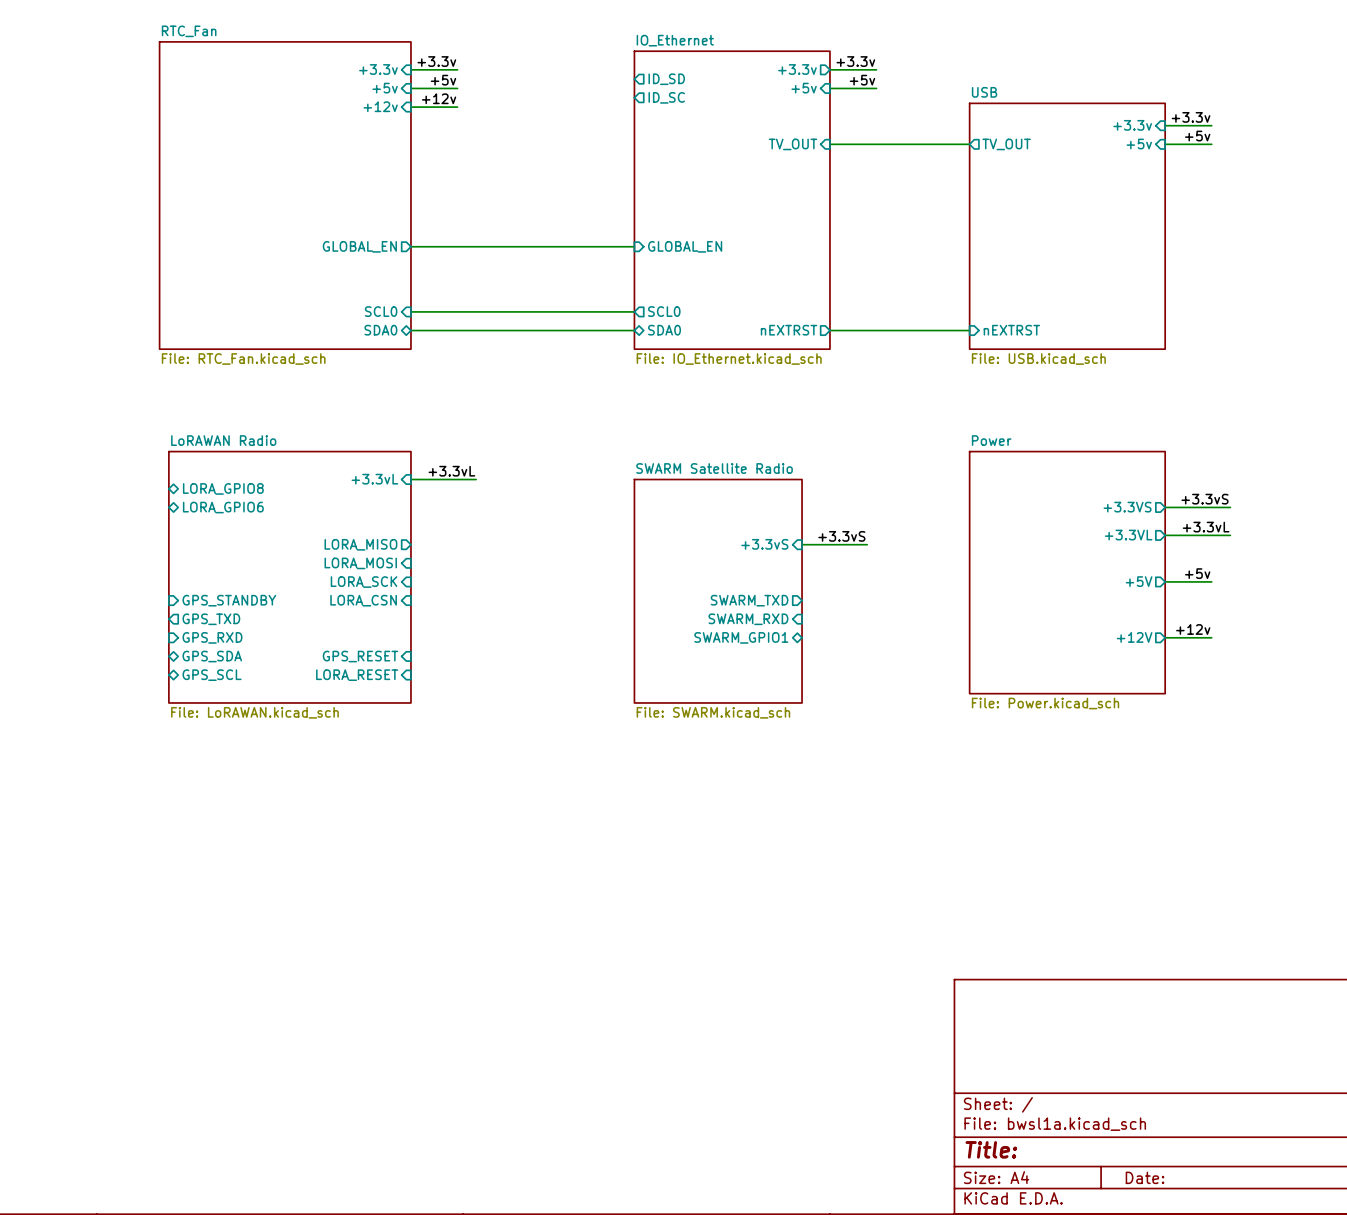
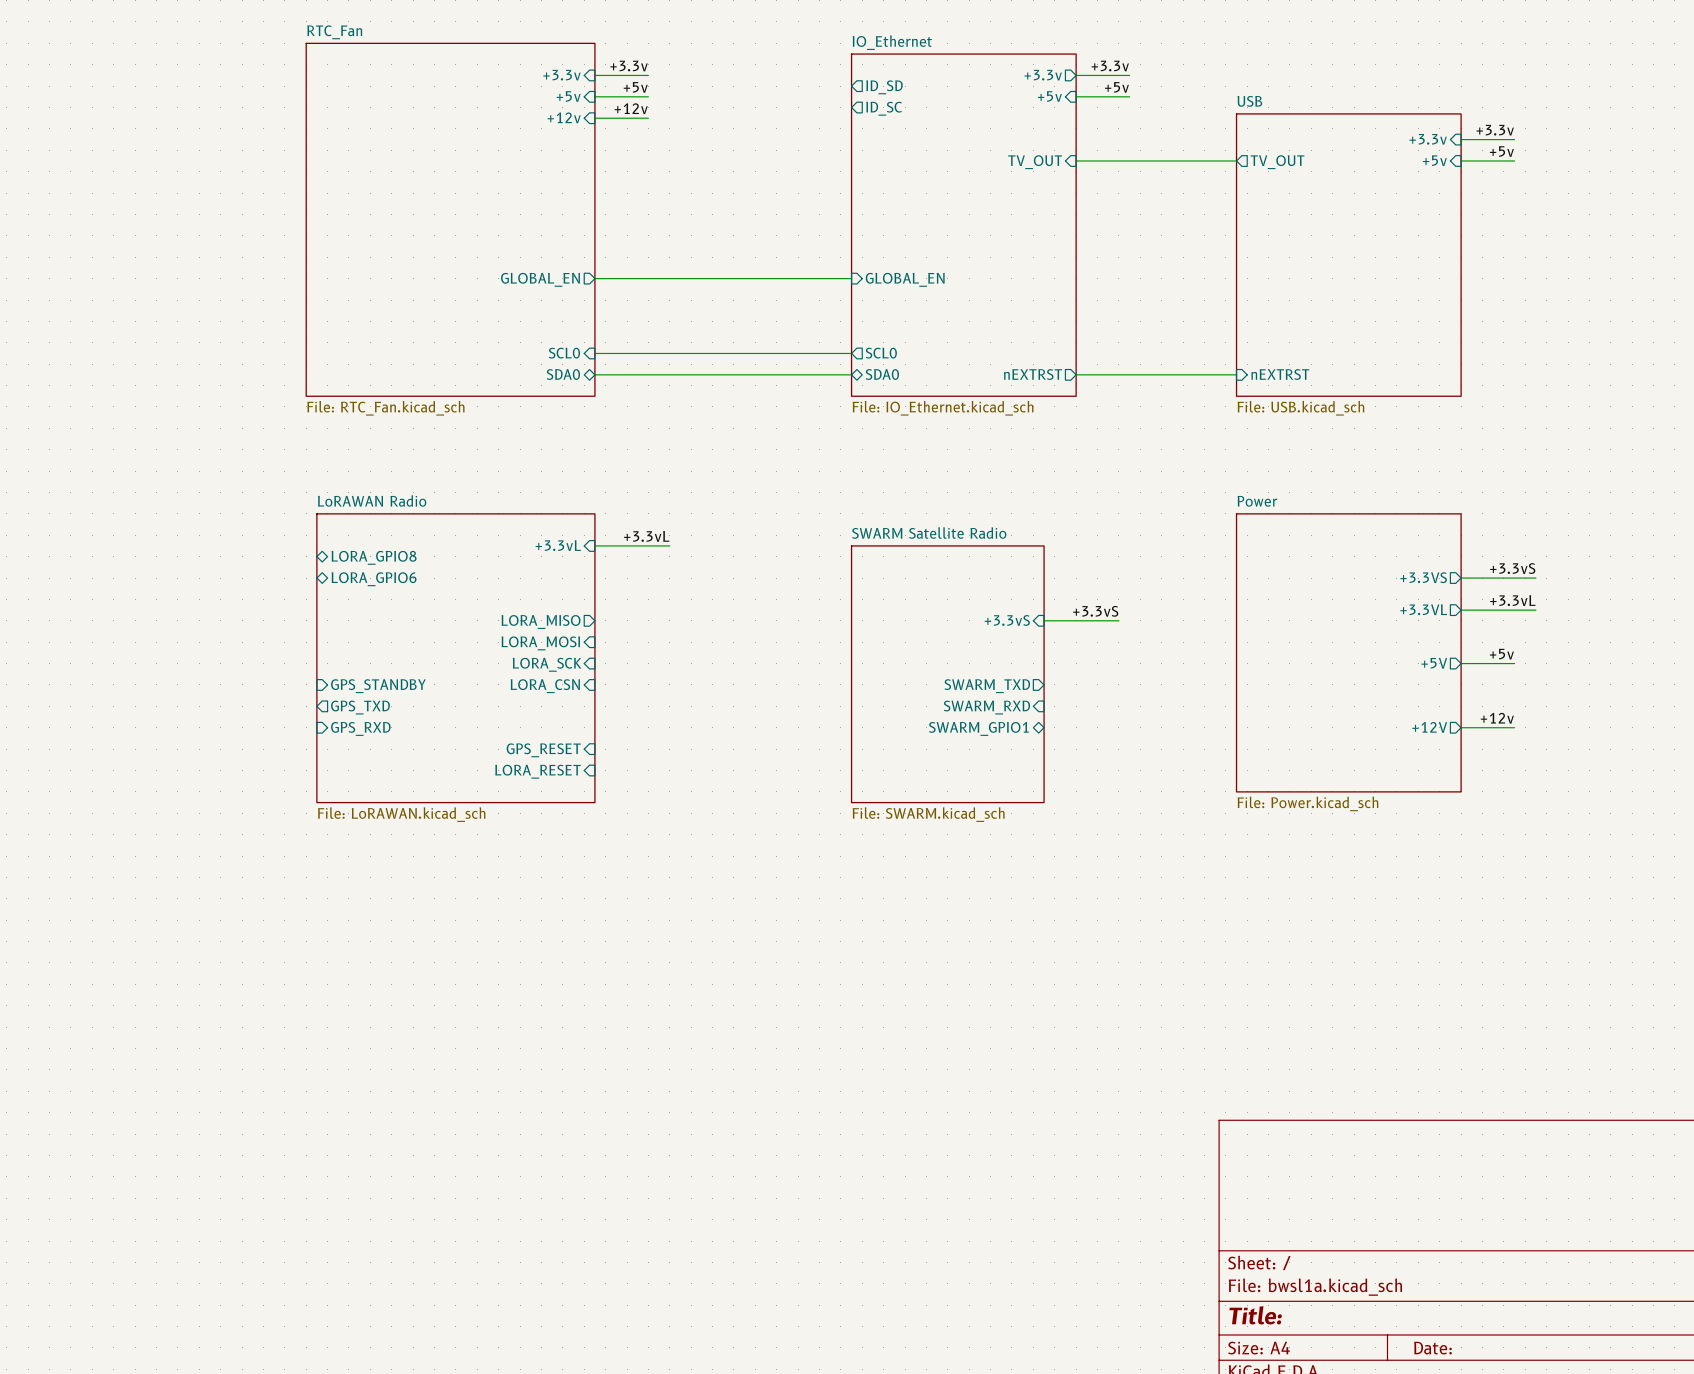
sheet pin: GPS_SDA (212, 656) -> none
sheet pin: GPS_SCL (212, 675) -> none

